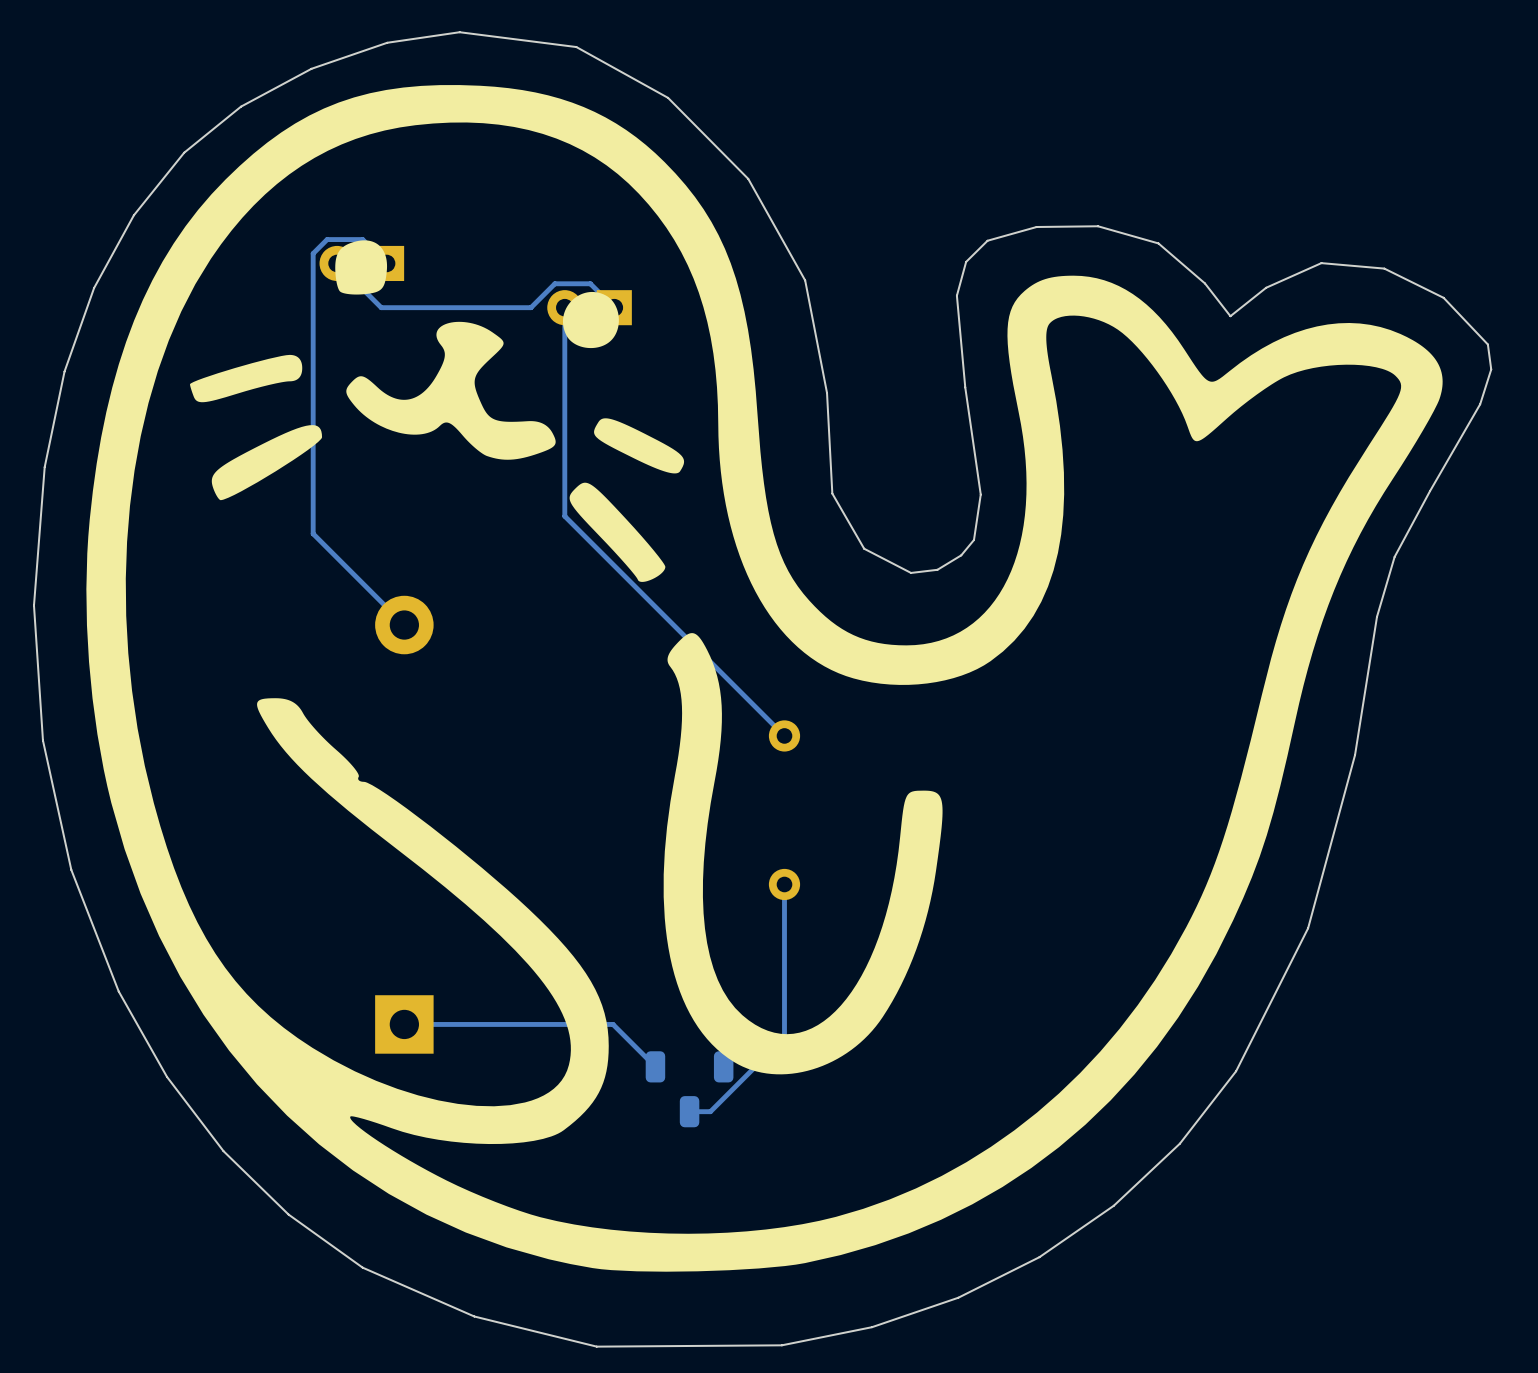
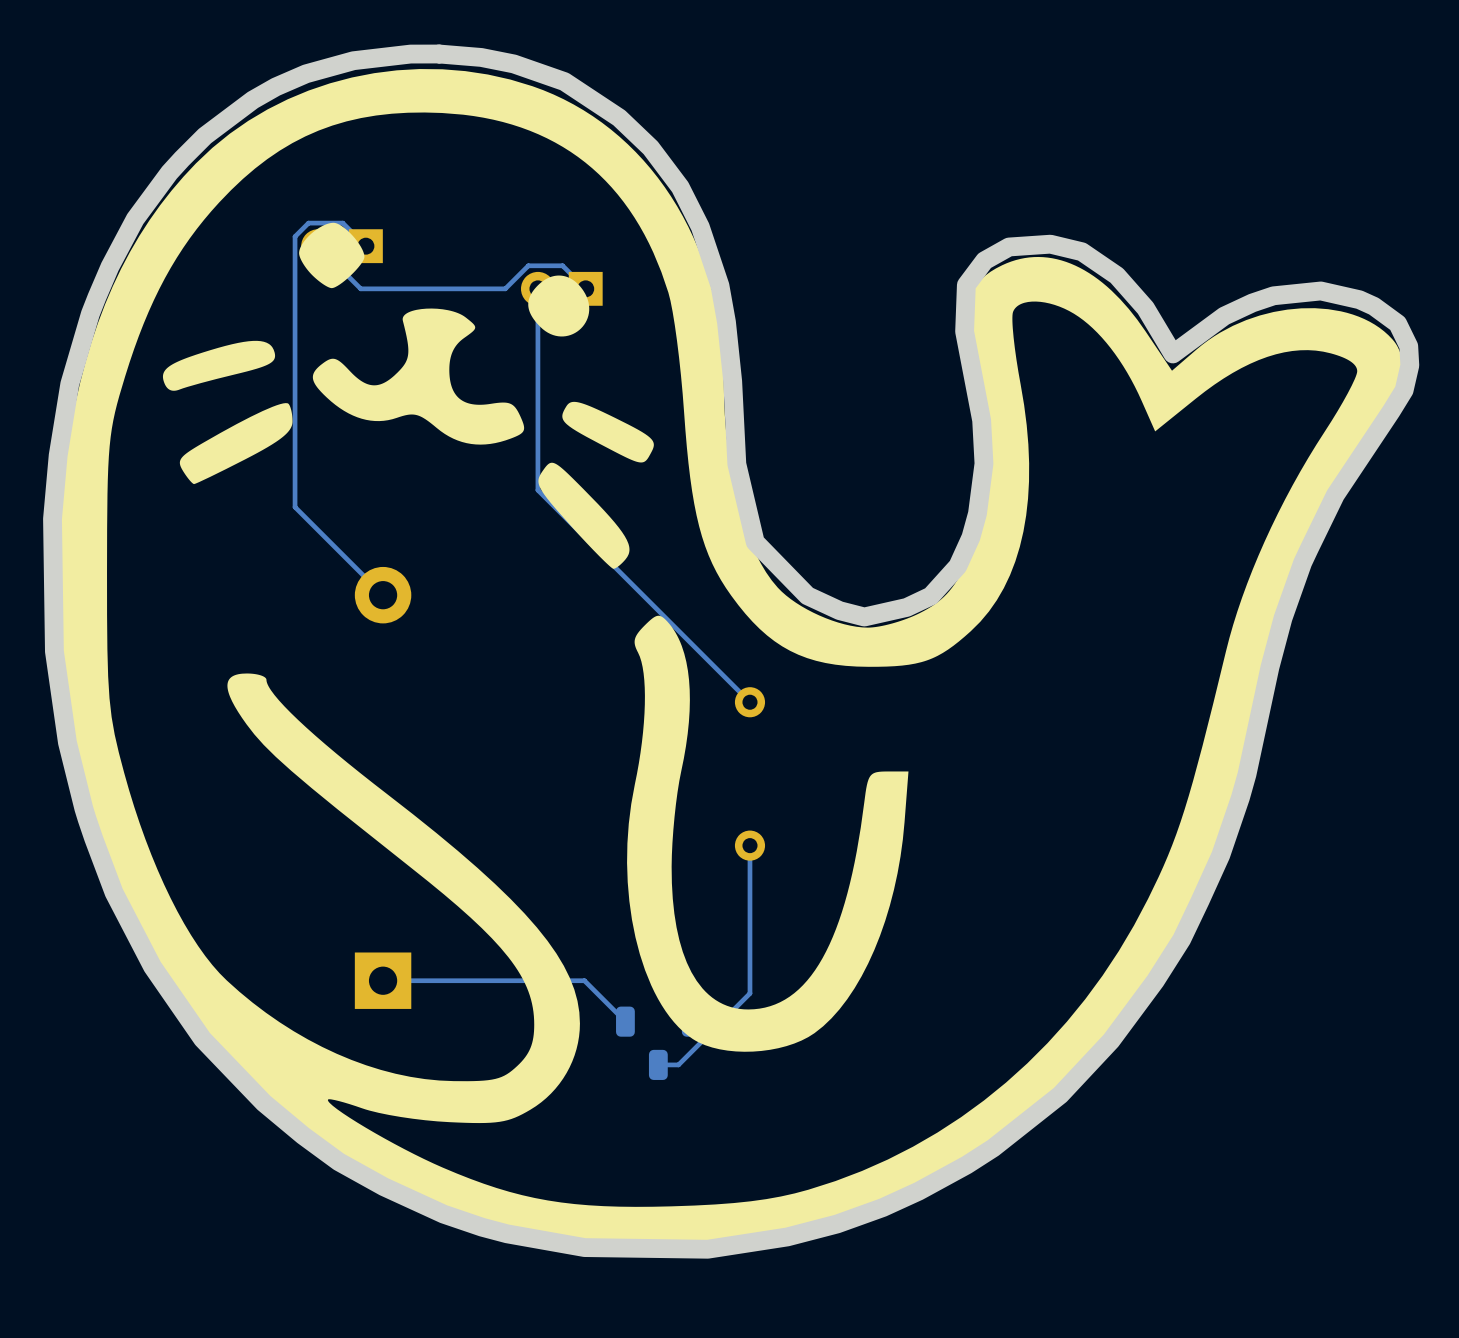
board edge: (459, 32) (576, 47) (668, 97) (748, 178) (805, 280) (827, 392) (832, 493) (864, 548) (911, 572) (937, 569) (961, 555) (973, 540) (980, 494) (965, 387) (956, 295) (966, 261) (987, 240) (1036, 227) (1098, 226) (1158, 243) (1205, 283) (1230, 316) (1266, 287) (1321, 263) (1384, 268) (1443, 297) (1487, 344) (1491, 369) (1480, 404) (1394, 556) (1377, 616) (1355, 755) (1308, 928) (1236, 1071) (1179, 1143) (1113, 1205) (1039, 1257) (958, 1297) (871, 1327) (781, 1345) (596, 1346) (474, 1316) (362, 1267) (288, 1214) (223, 1151) (167, 1076) (118, 991) (71, 869) (42, 740) (33, 605) (44, 467) (64, 371) (94, 288) (133, 215) (184, 152) (240, 106) (311, 68) (387, 42) (459, 32) -> none
drawing: none -> [57, 69, 1402, 1252]
drawing shape: [86, 85, 1443, 1272] -> [43, 44, 1420, 1259]
drawing shape: [335, 240, 388, 295] -> [299, 222, 365, 289]
drawing shape: [562, 291, 619, 349] -> [528, 275, 590, 337]
drawing shape: [346, 321, 556, 460] -> [312, 308, 525, 445]
drawing shape: [190, 354, 303, 403] -> [162, 340, 276, 391]
drawing shape: [594, 418, 685, 474] -> [562, 401, 654, 463]
drawing shape: [211, 425, 323, 501] -> [179, 403, 293, 485]
drawing shape: [569, 482, 666, 582] -> [538, 462, 630, 569]
drawing shape: [663, 633, 943, 1075] -> [627, 615, 909, 1052]

